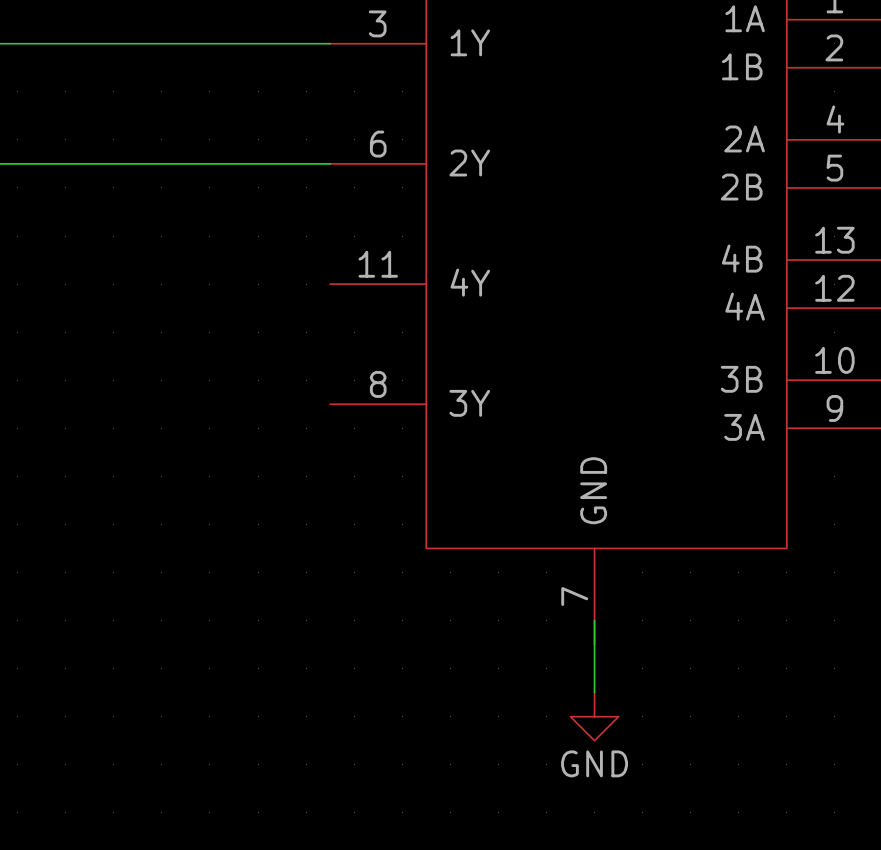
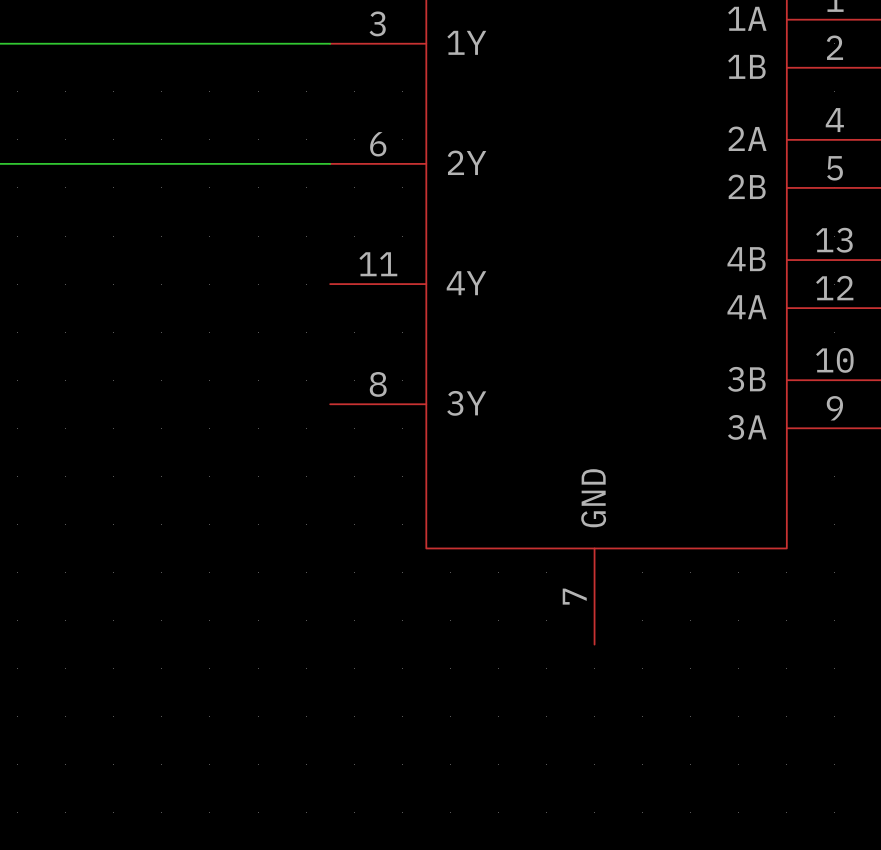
wire: (594, 620) (594, 692) -> none
power symbol: GND (594, 716) -> none

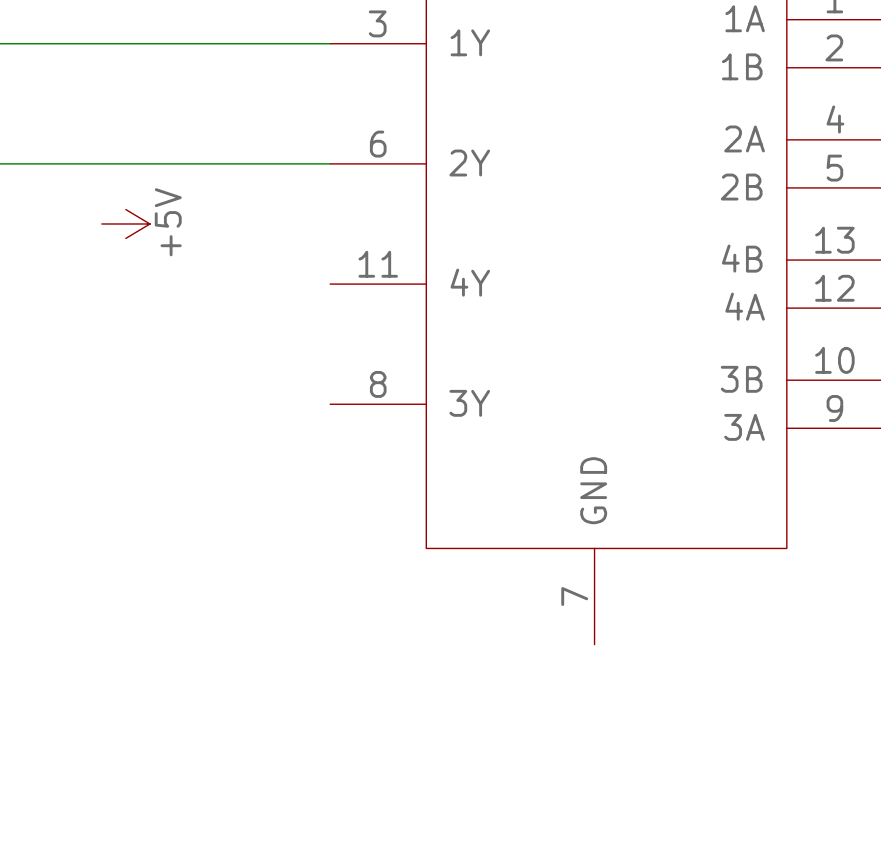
power symbol: none -> +5V (125, 223)

